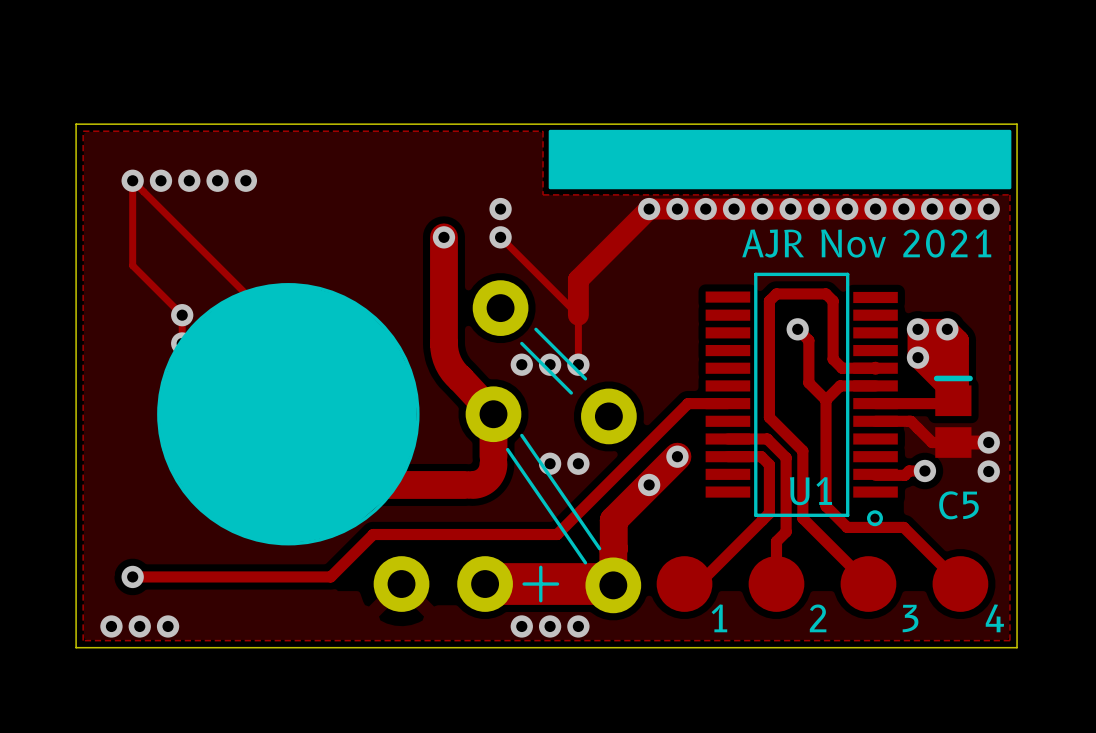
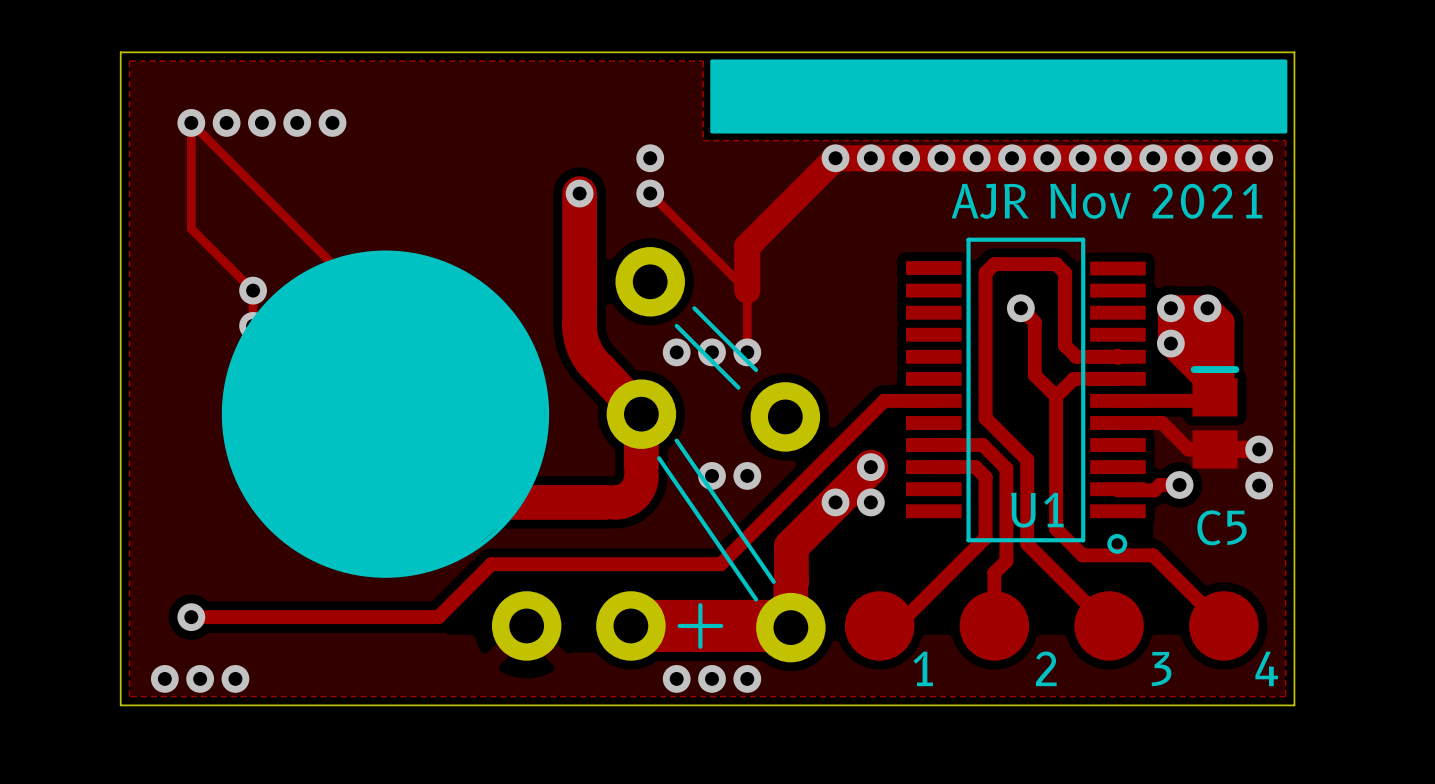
via: none -> (870, 502)

